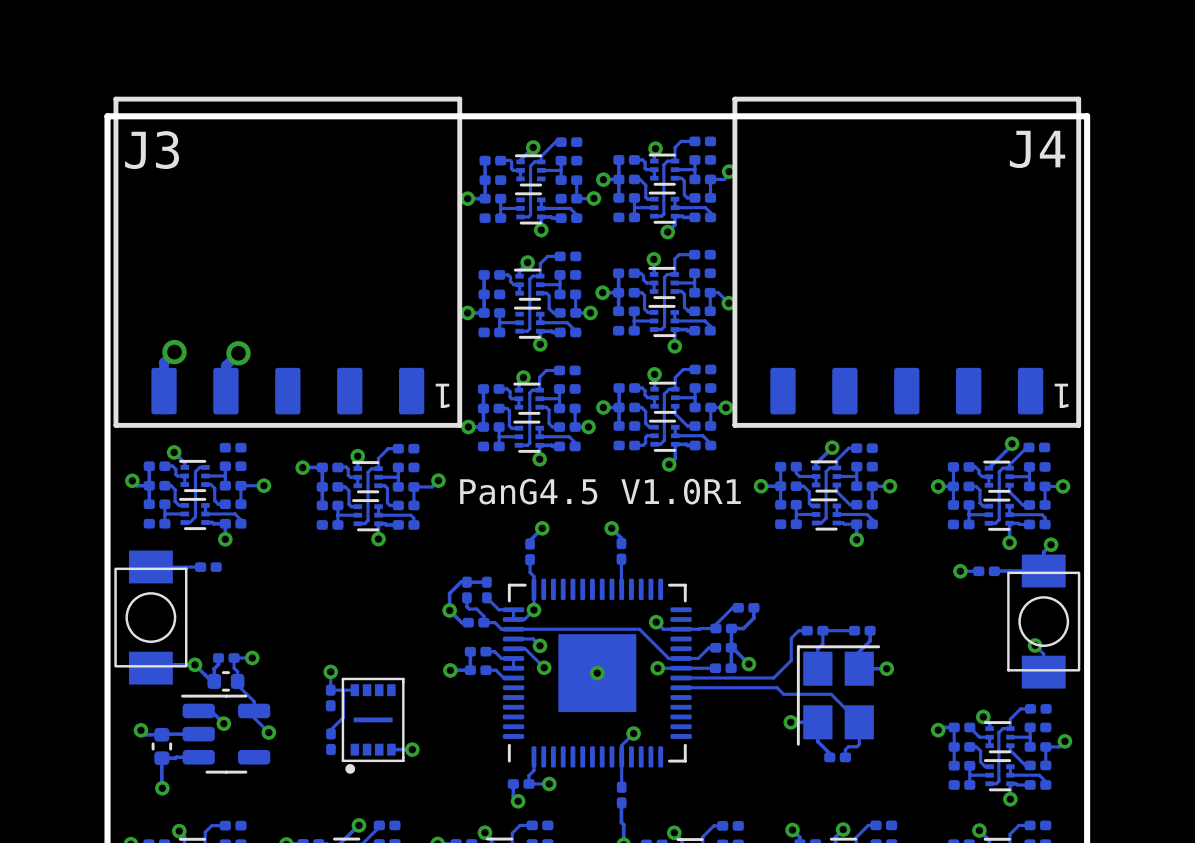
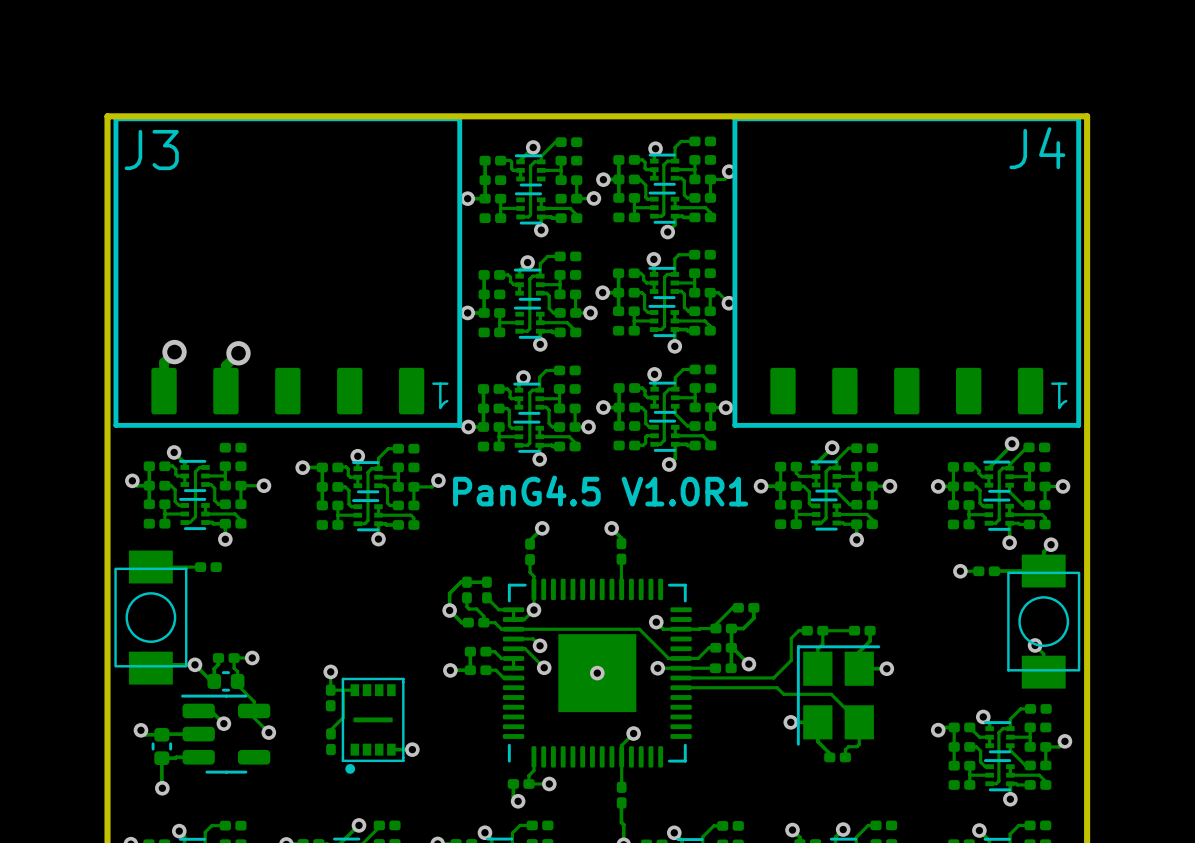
J3 footprint: [113, 96, 463, 428] -> [113, 116, 463, 428]
J4 footprint: [732, 96, 1082, 428] -> [732, 116, 1082, 428]

